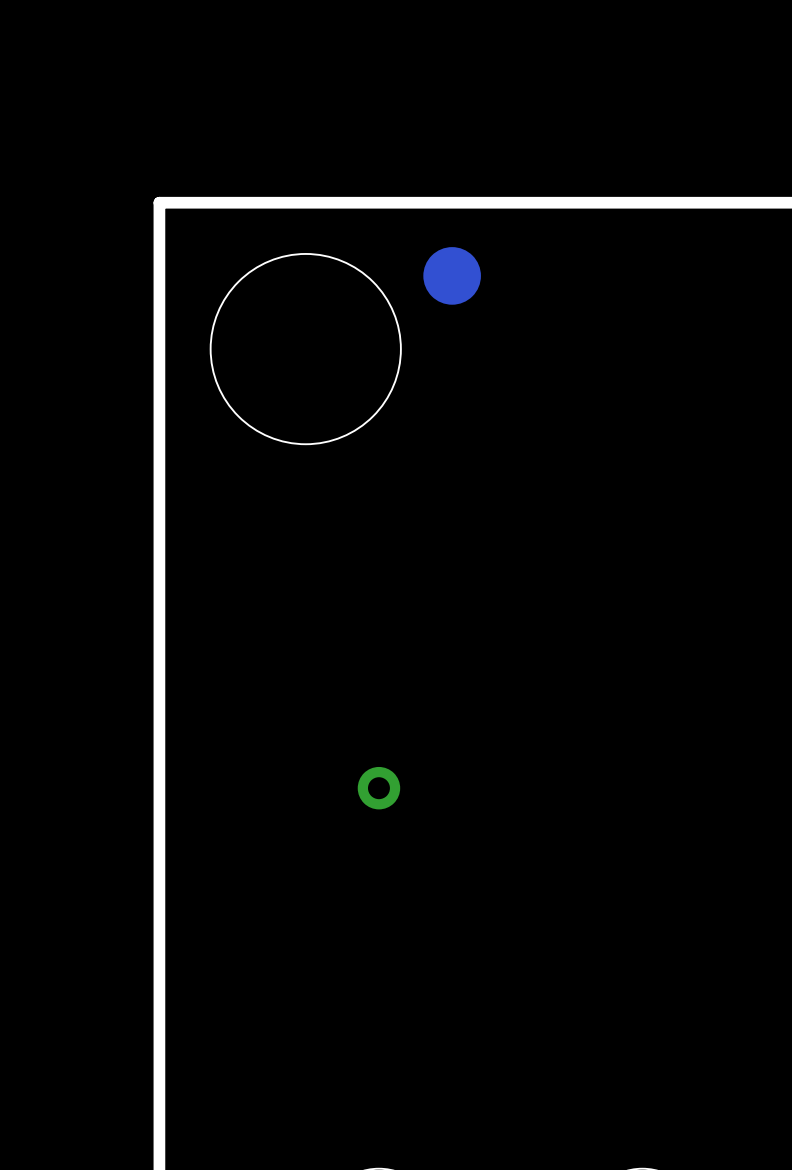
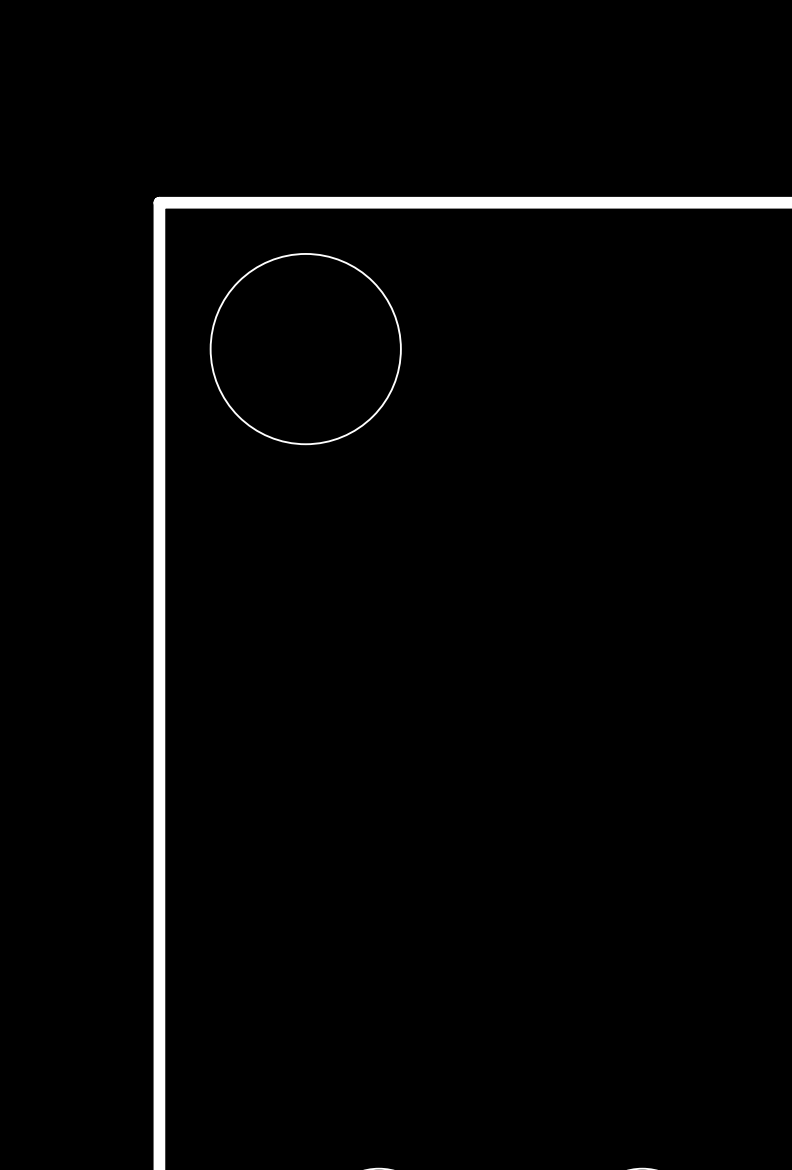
part: (452, 275) -> none
via: (378, 788) -> none

